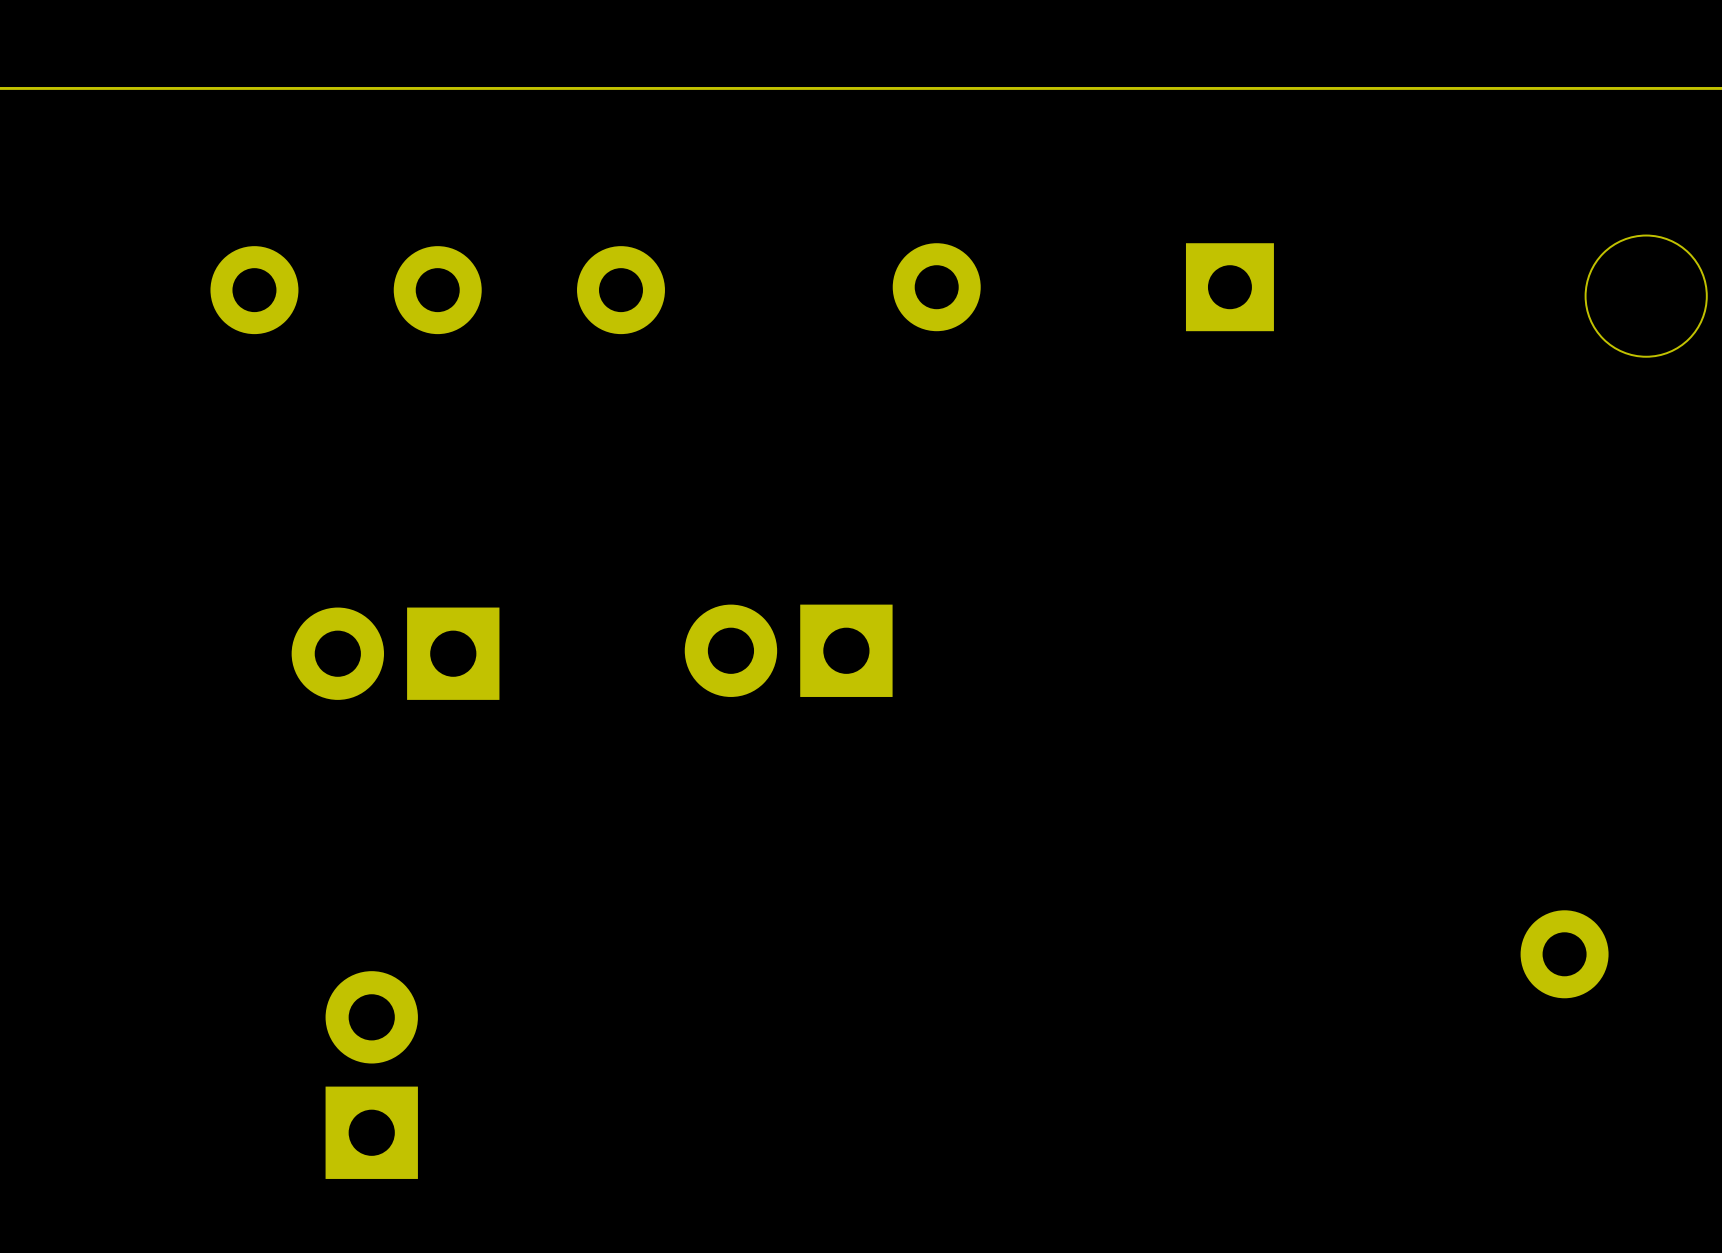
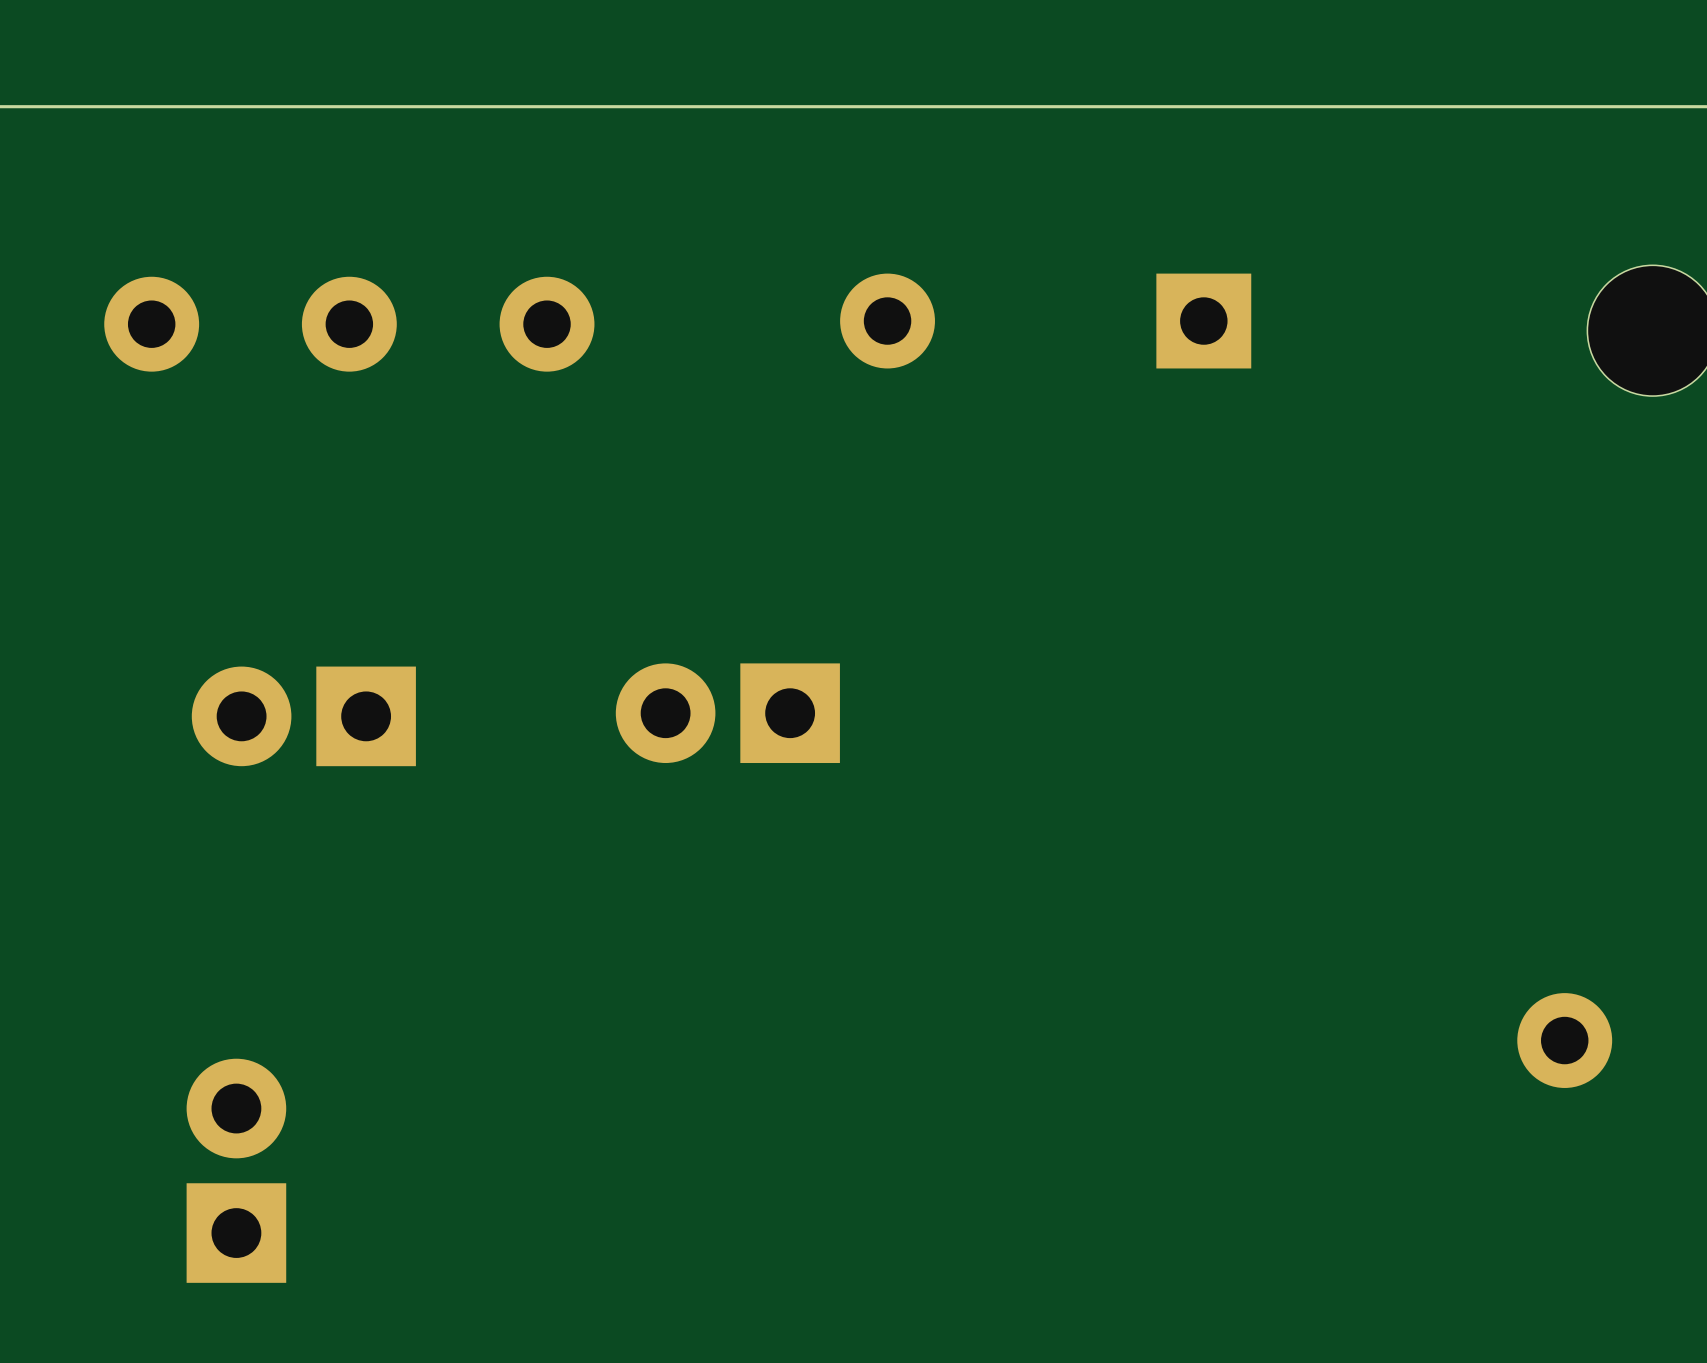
part position: (371, 1075) -> (236, 1170)

